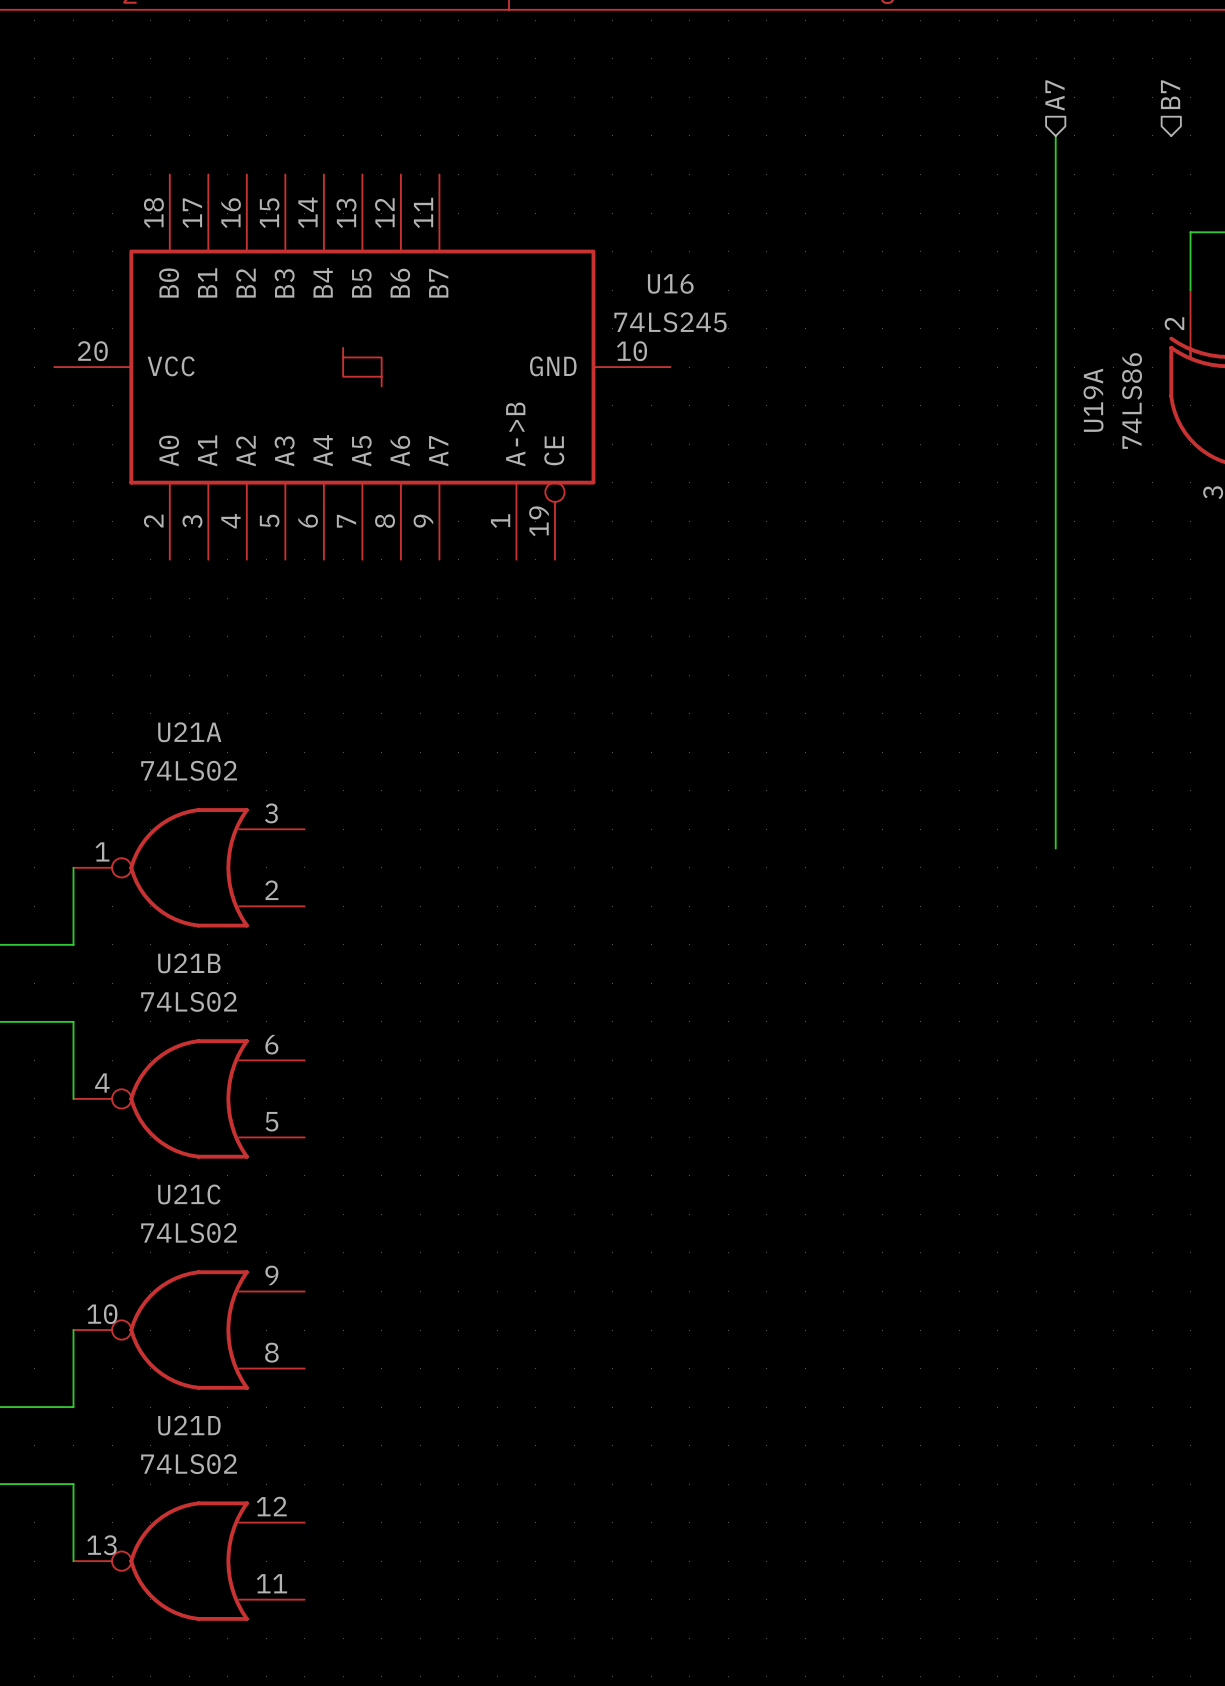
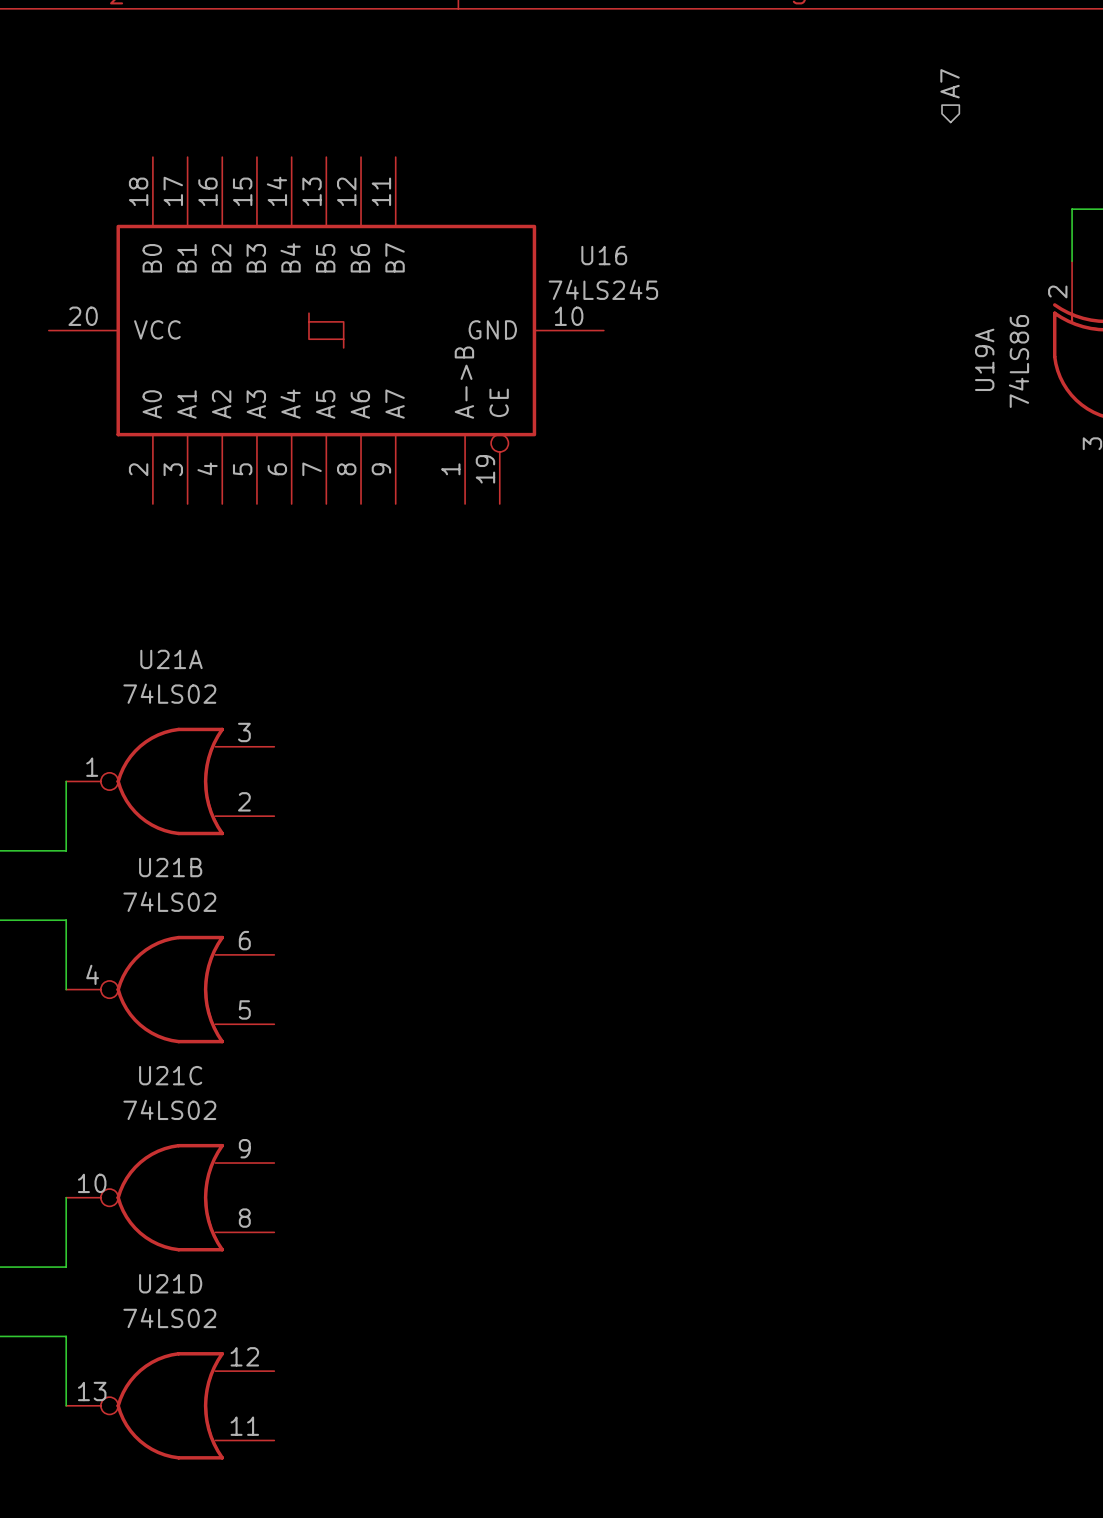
hierarchical label: B7 (1170, 94) -> none
wire: (1055, 135) (1055, 848) -> none

